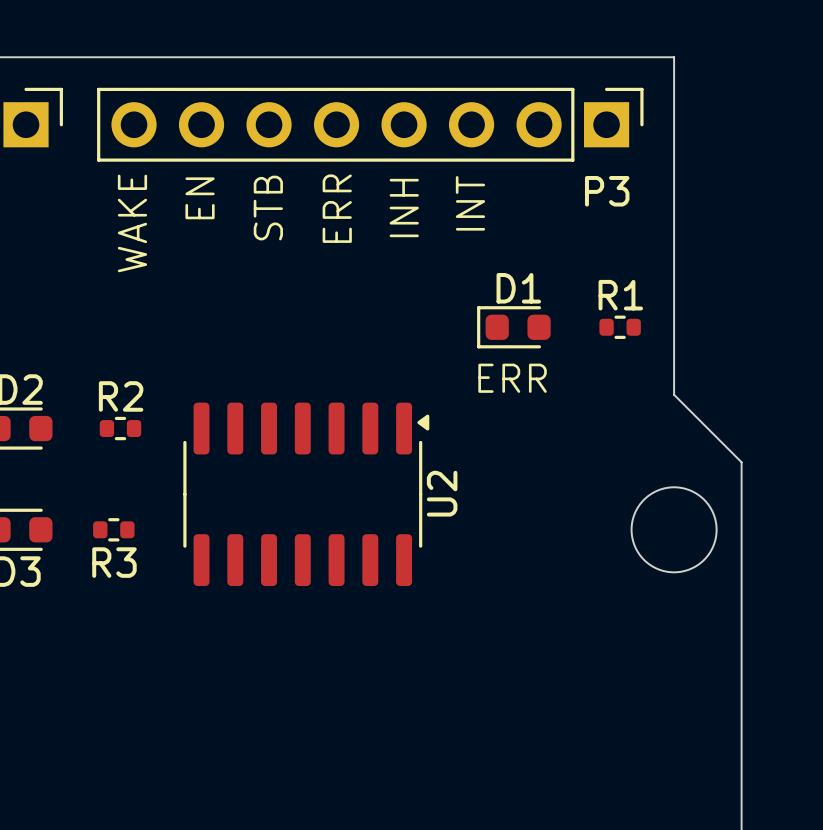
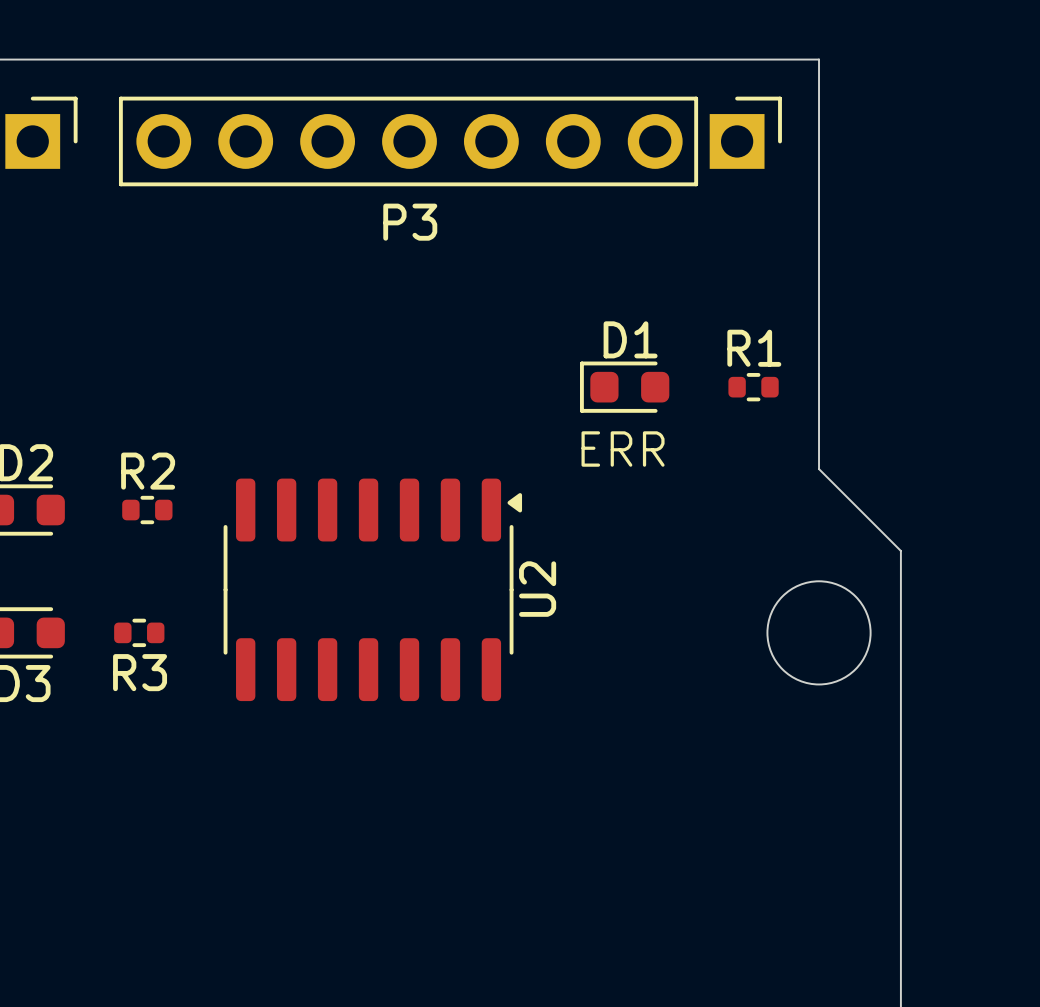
P3 name position: P3 (607, 191) -> P3 (410, 222)
text: EN (200, 198) -> none
text: INT (470, 203) -> none
text: STB (268, 208) -> none
text: ERR (337, 208) -> none
text: INH (404, 208) -> none
text: WAKE (132, 223) -> none

